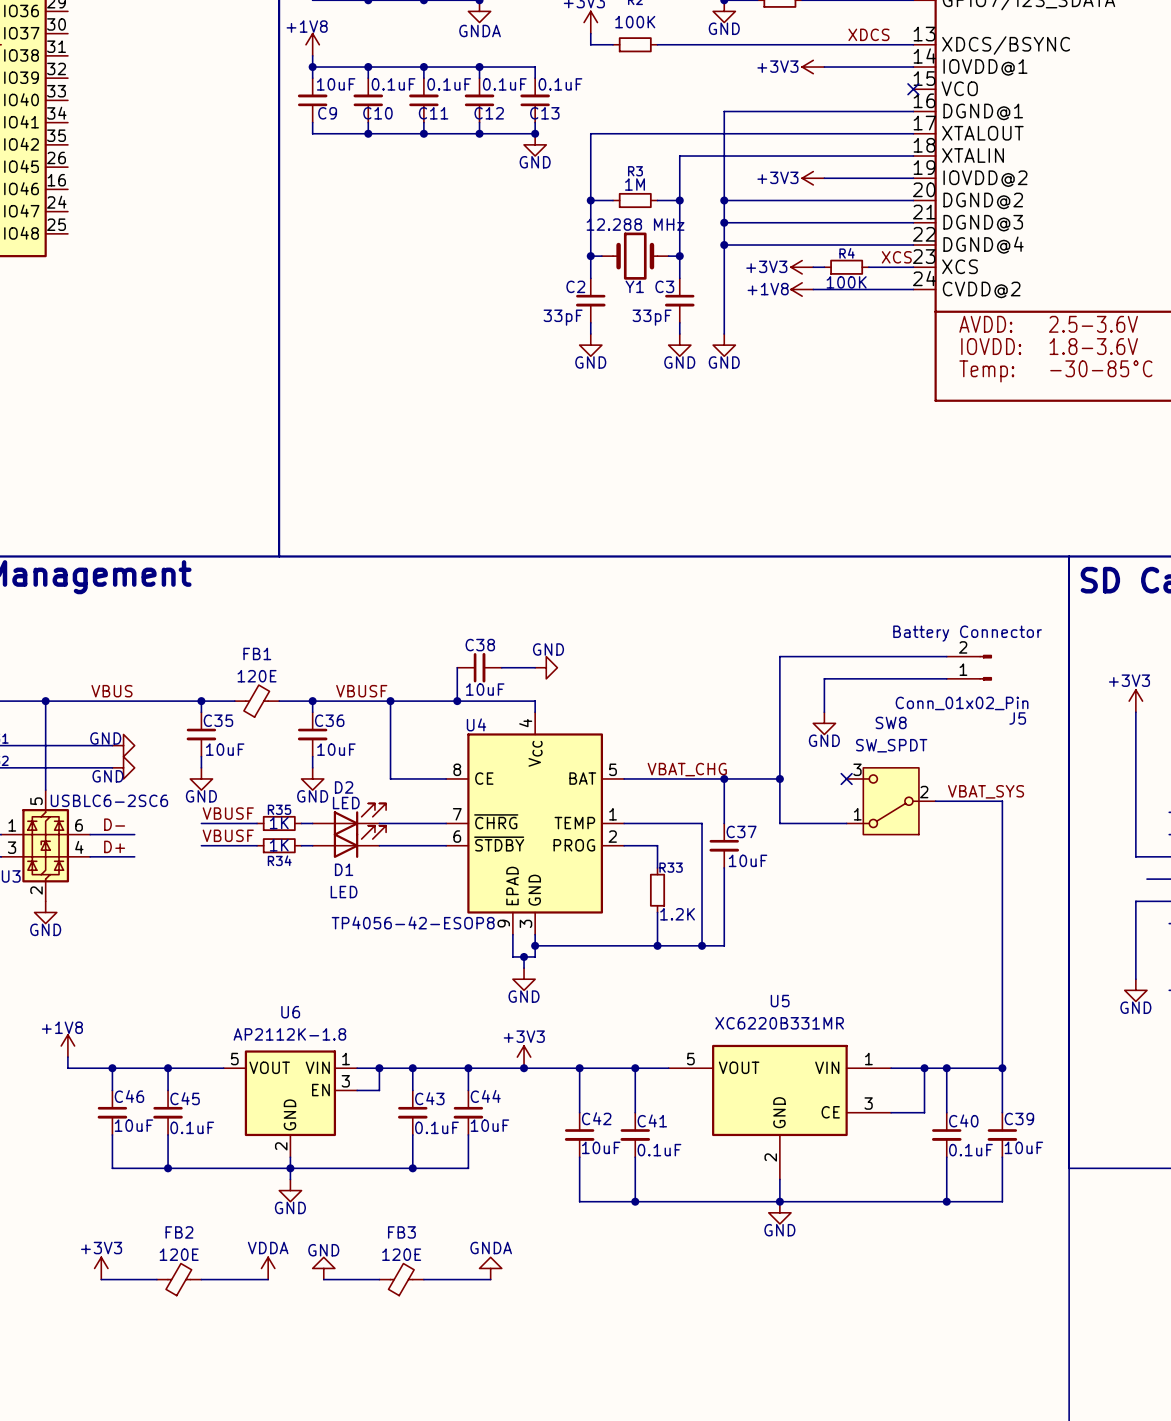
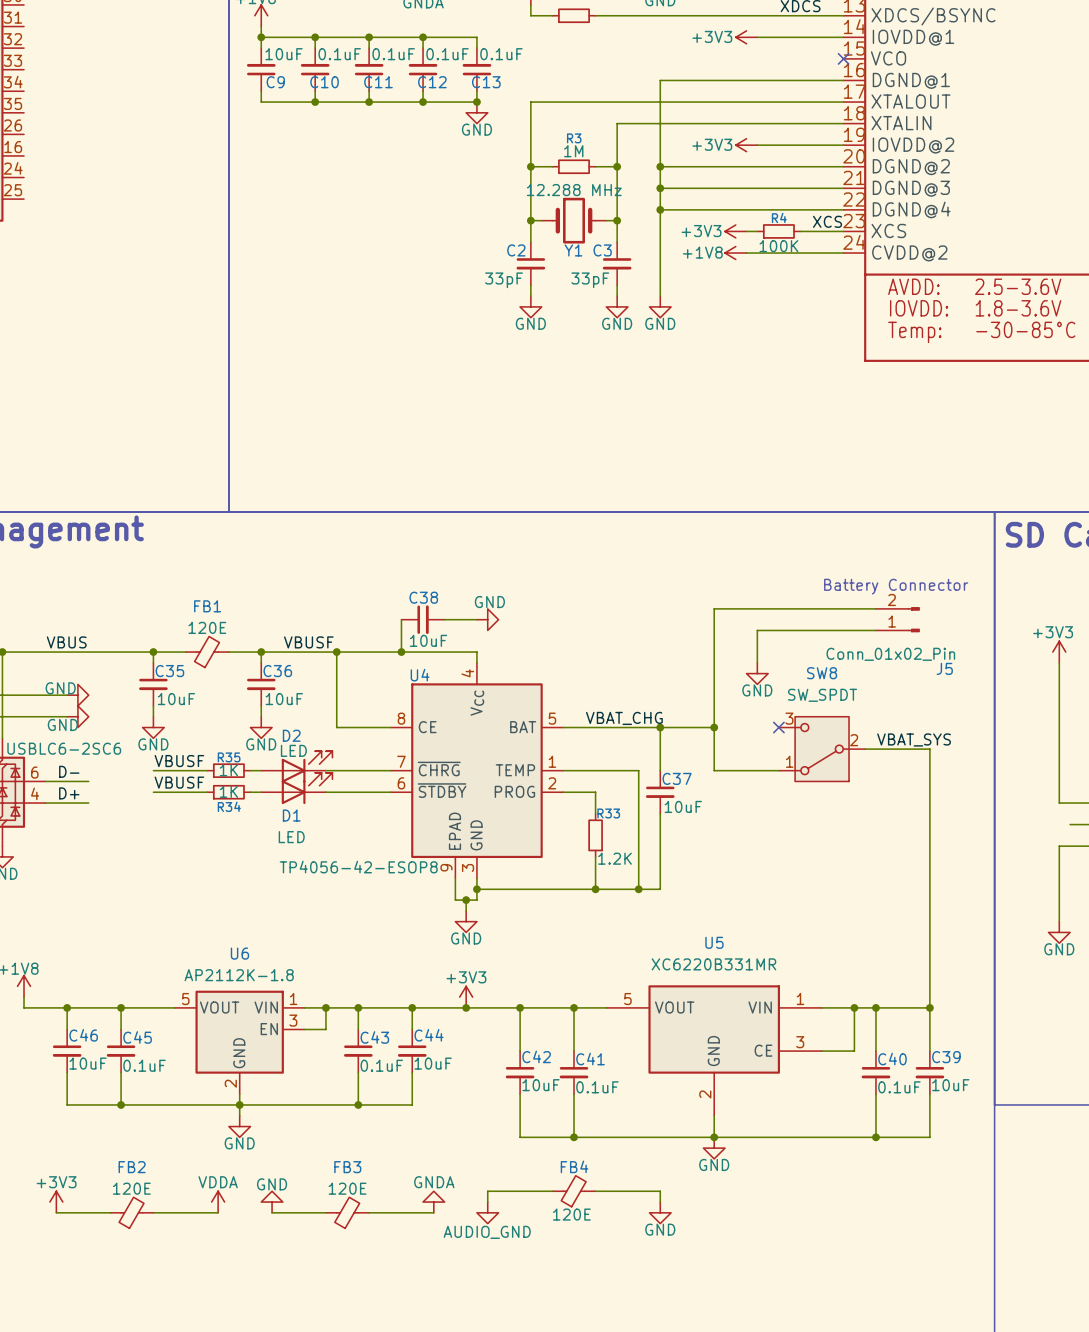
wire: none -> (552, 1191) (487, 1191) (487, 1202)
FB4: none -> 120E (574, 1191)
wire: none -> (595, 1191) (660, 1191) (660, 1202)
power symbol: none -> AUDIO_GND (487, 1212)
power symbol: none -> GND (660, 1212)

